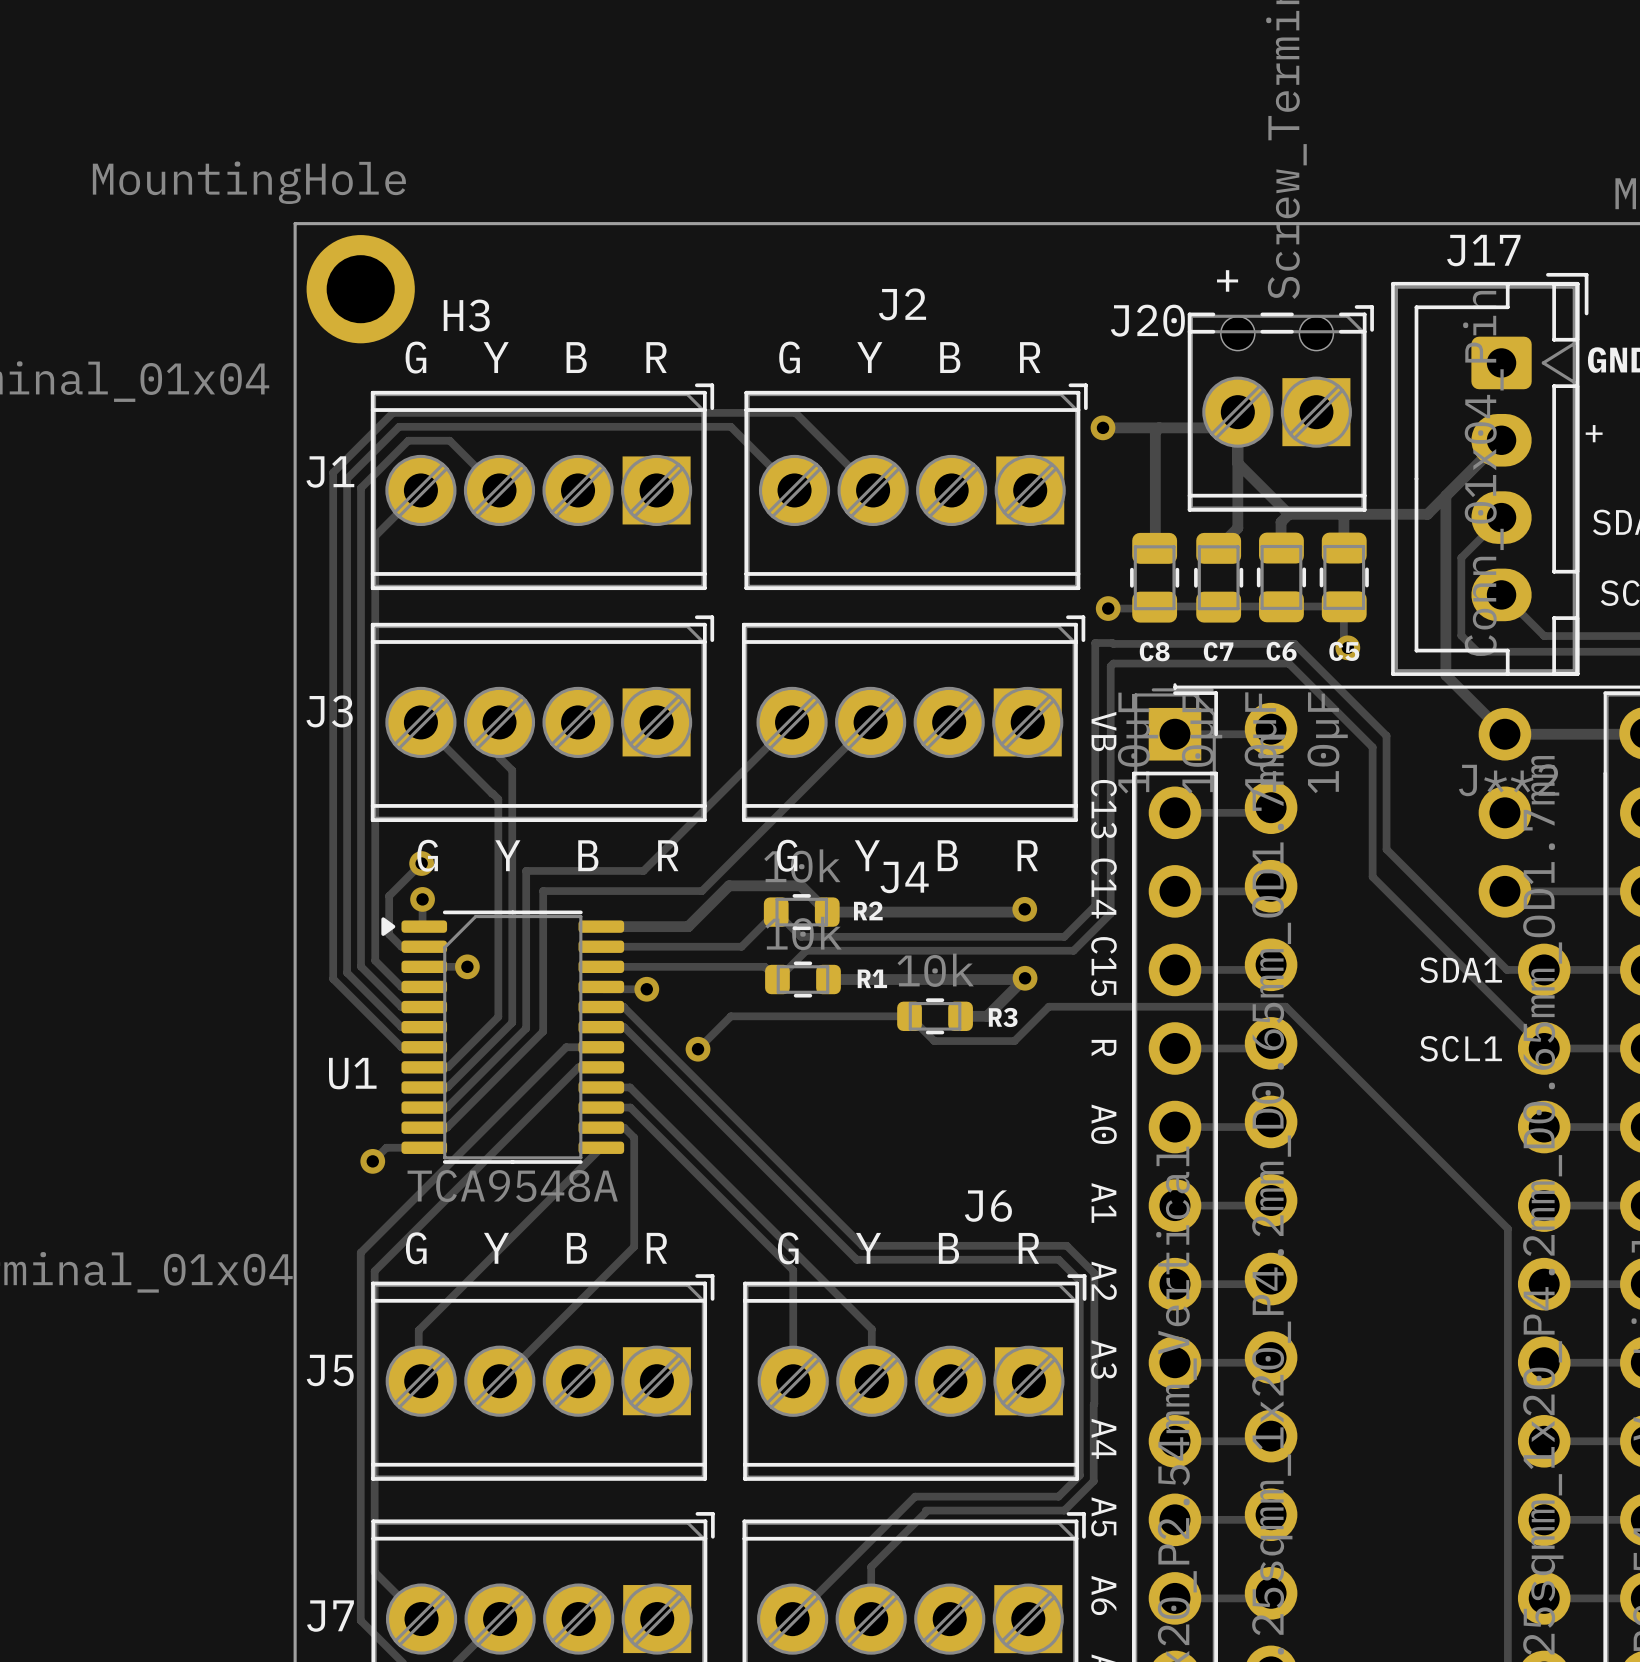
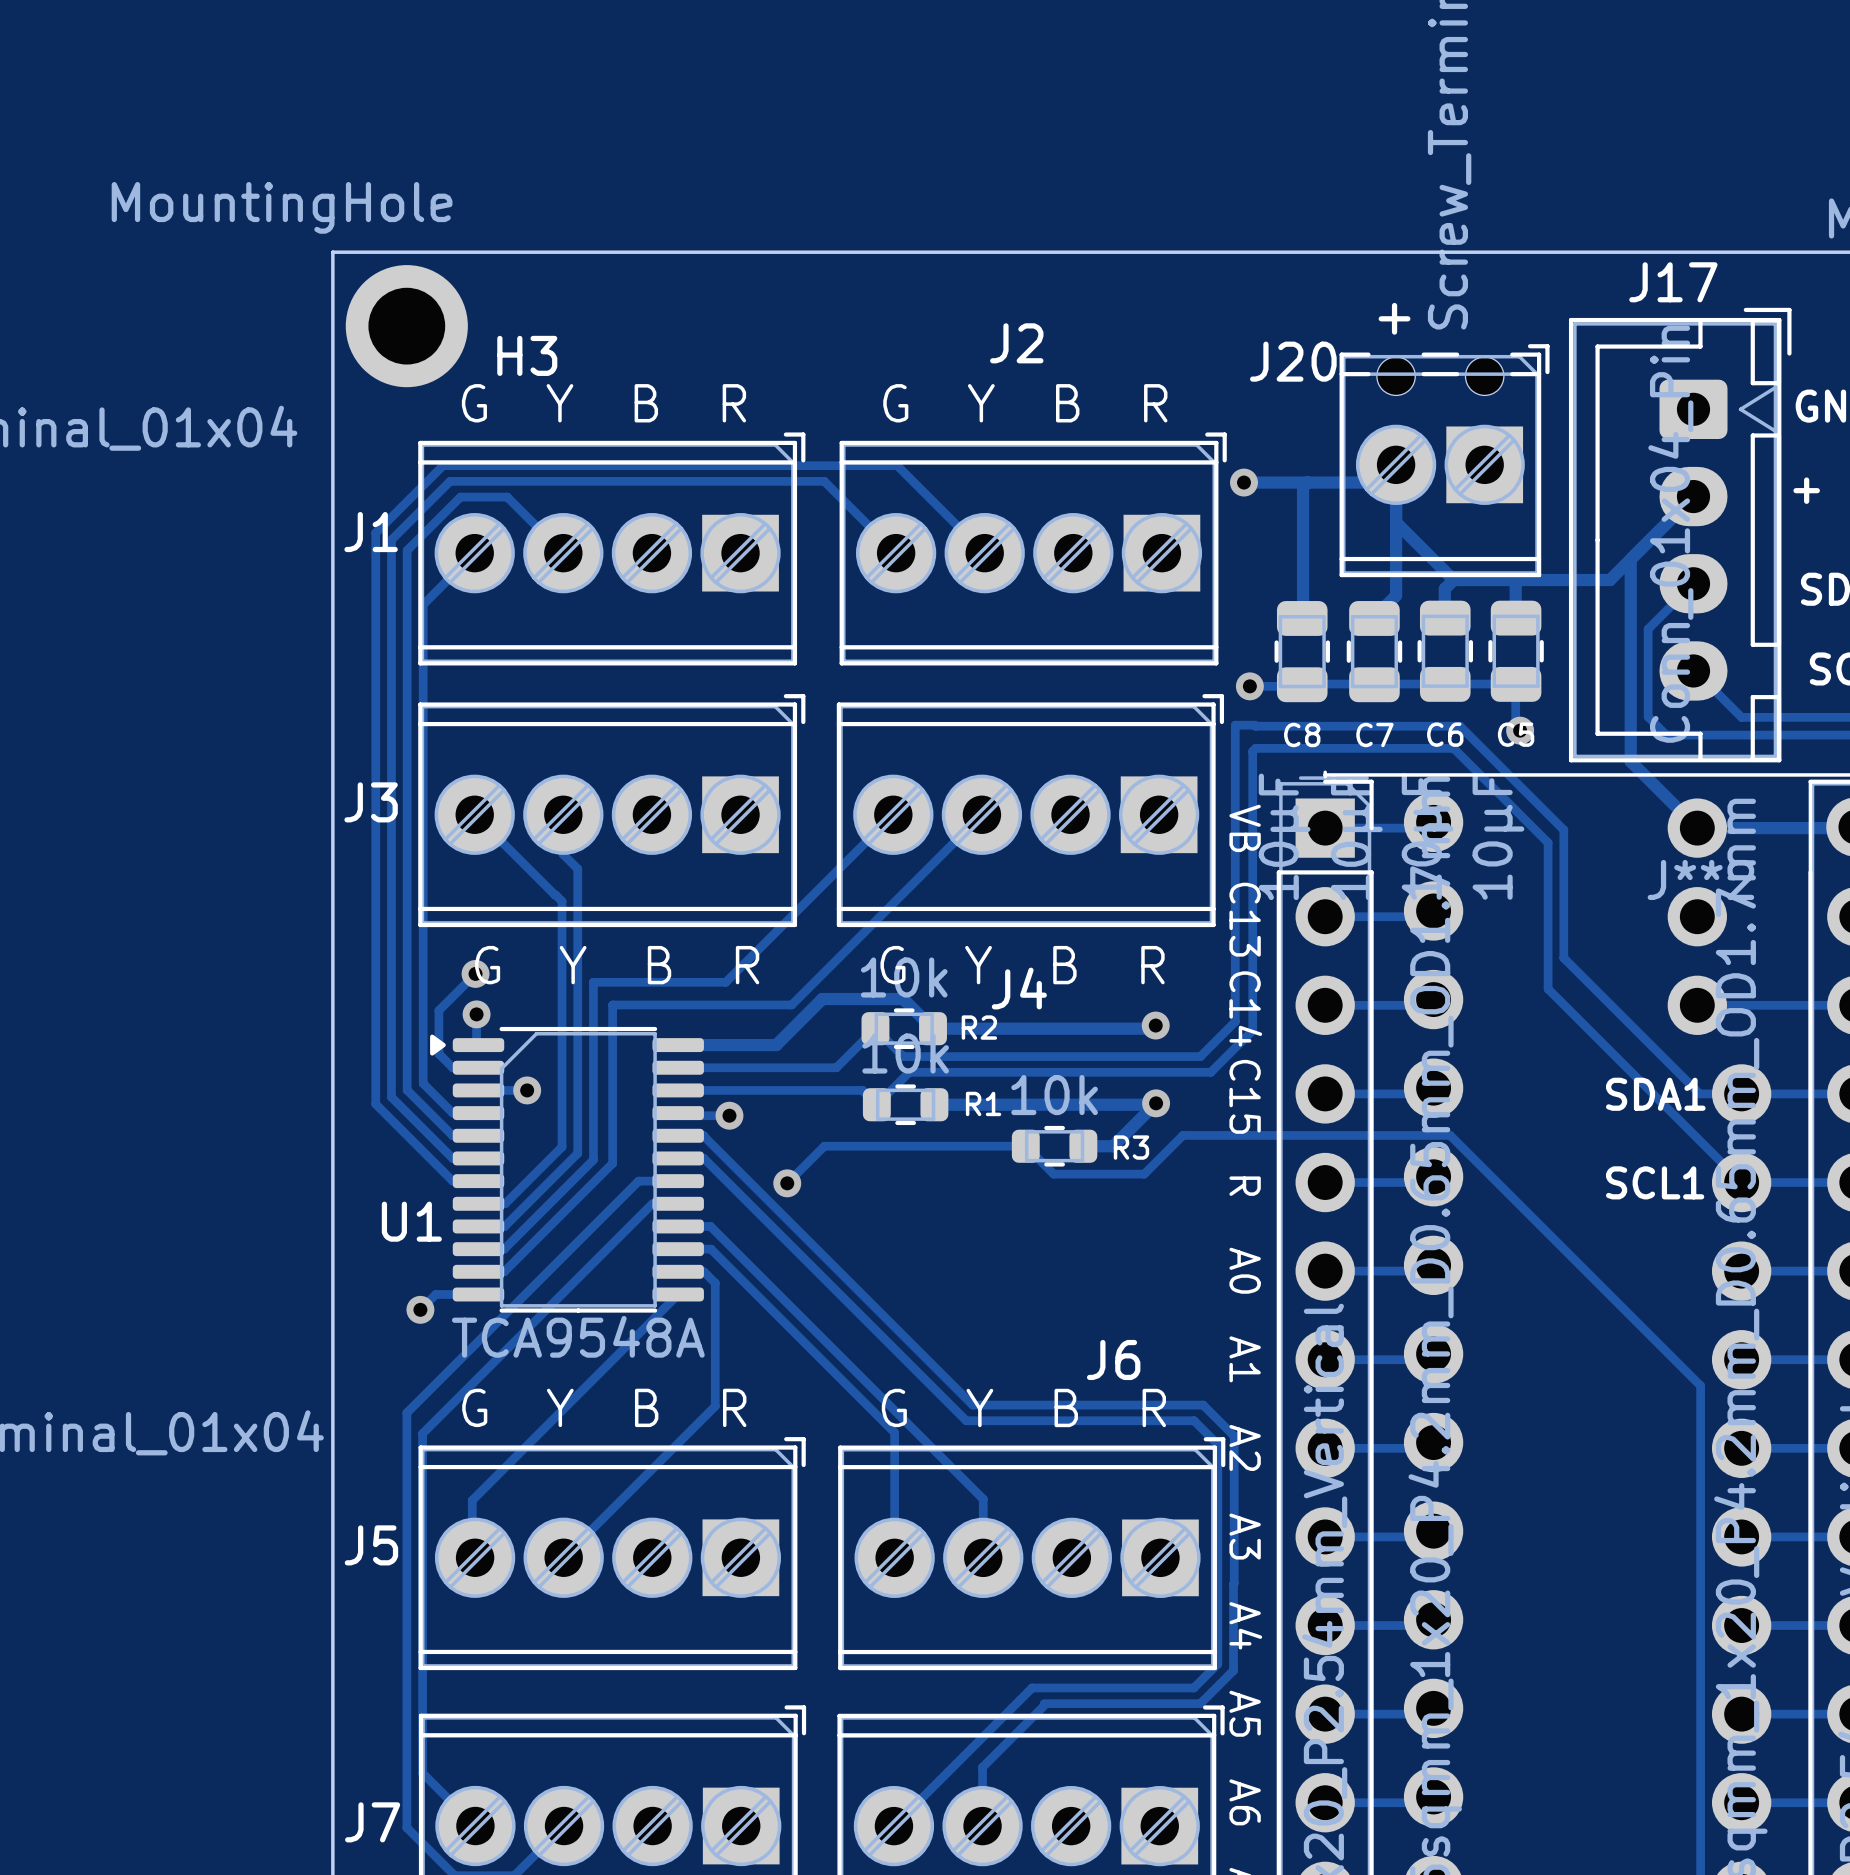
U1 name position: U1 (352, 1073) -> U1 (411, 1221)

